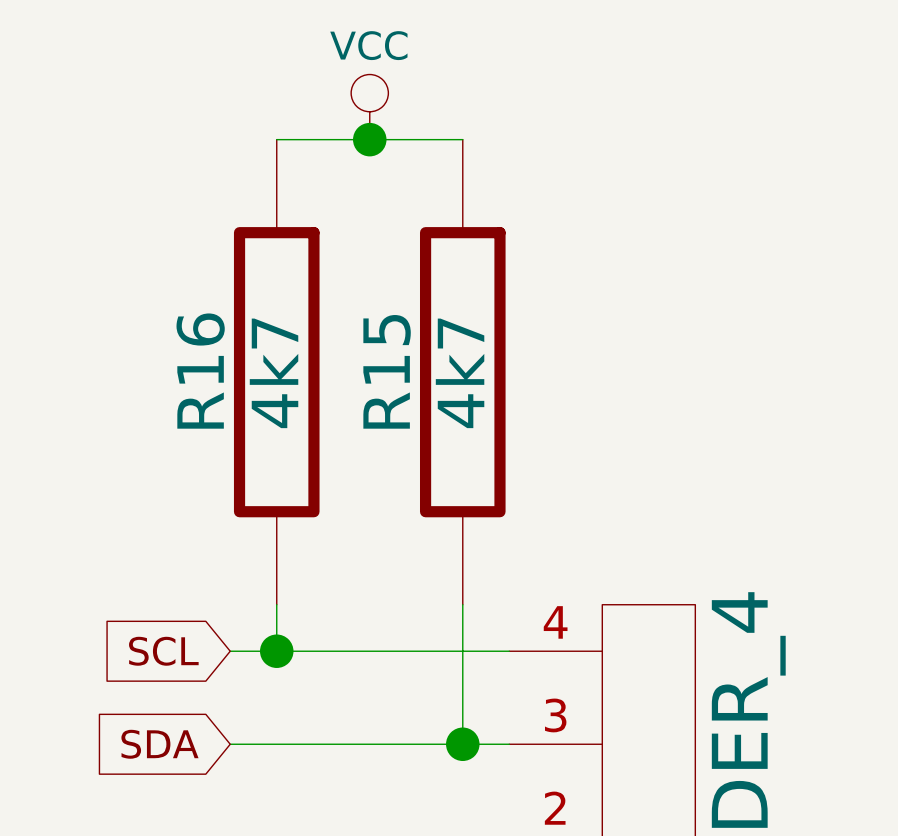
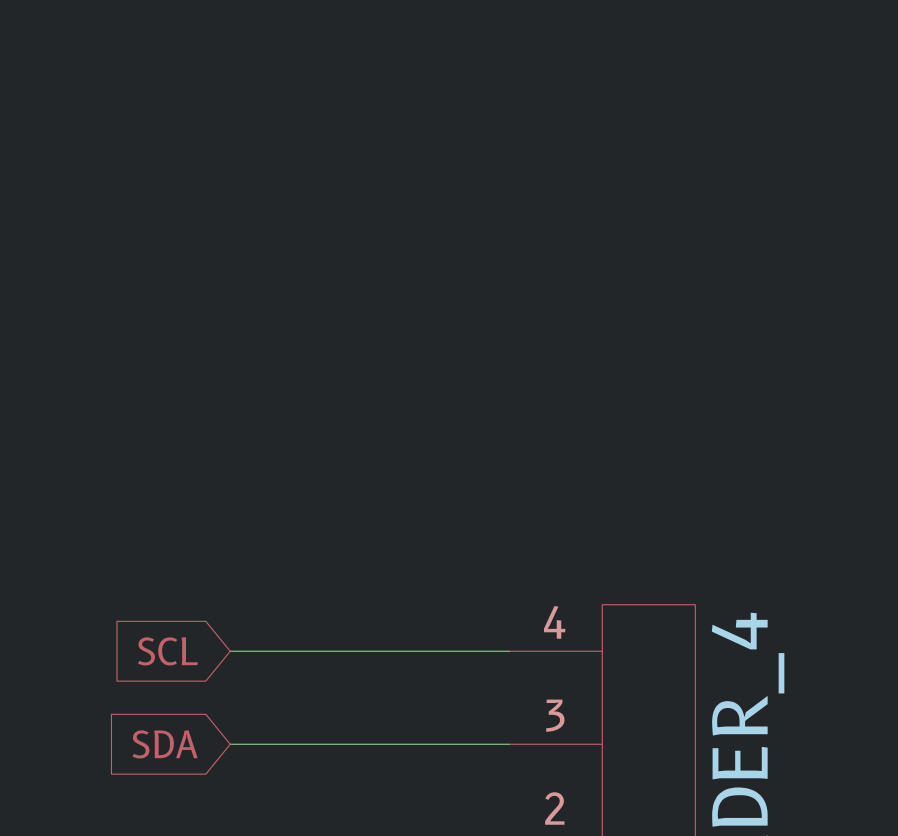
power symbol: VCC (369, 107) -> none
wire: (276, 139) (462, 139) -> none
junction: (369, 139) -> none
R16: 4k7 (276, 372) -> none
R15: 4k7 (462, 372) -> none
wire: (276, 604) (276, 651) -> none
wire: (462, 604) (462, 744) -> none
junction: (276, 651) -> none
junction: (462, 744) -> none

